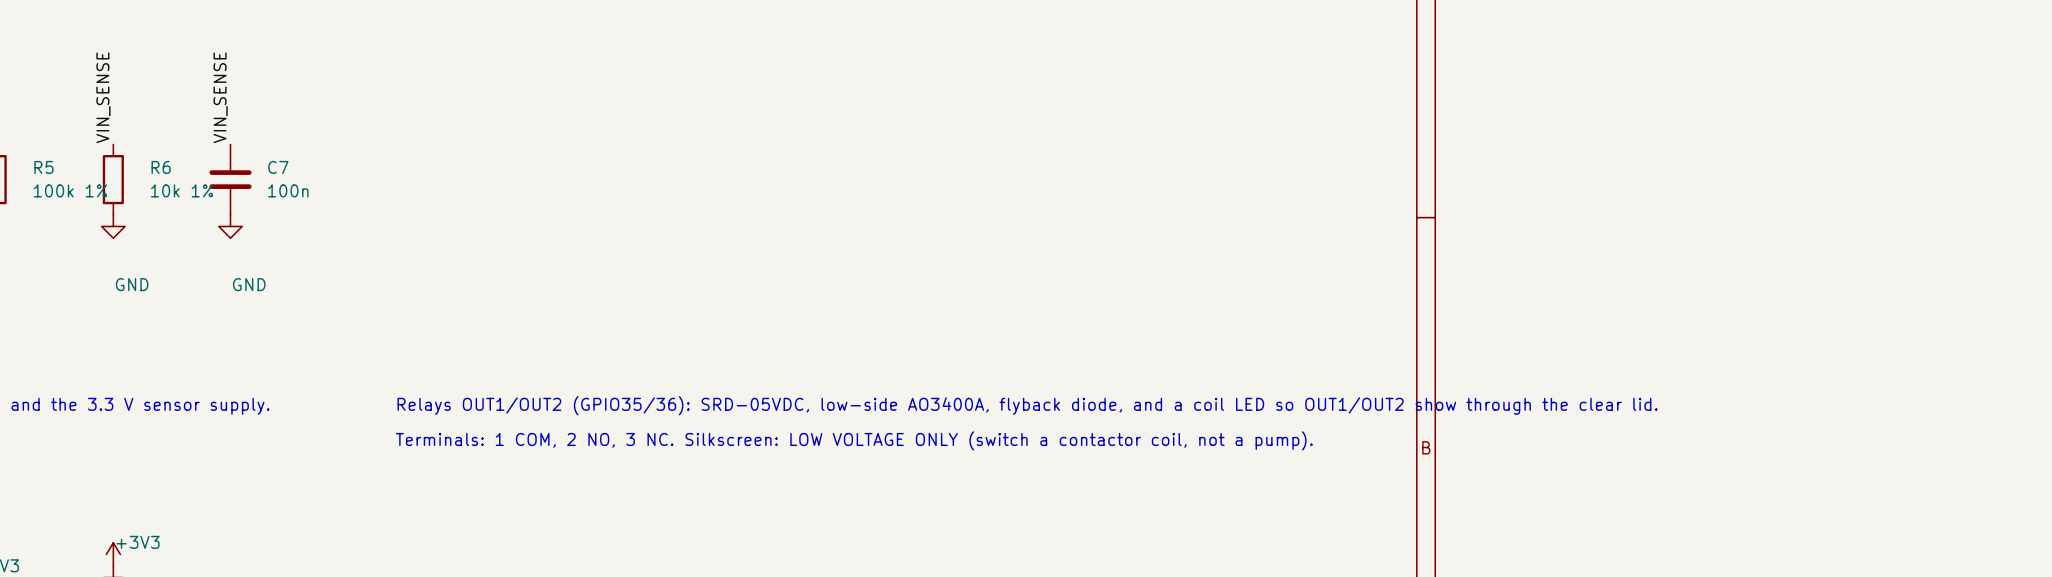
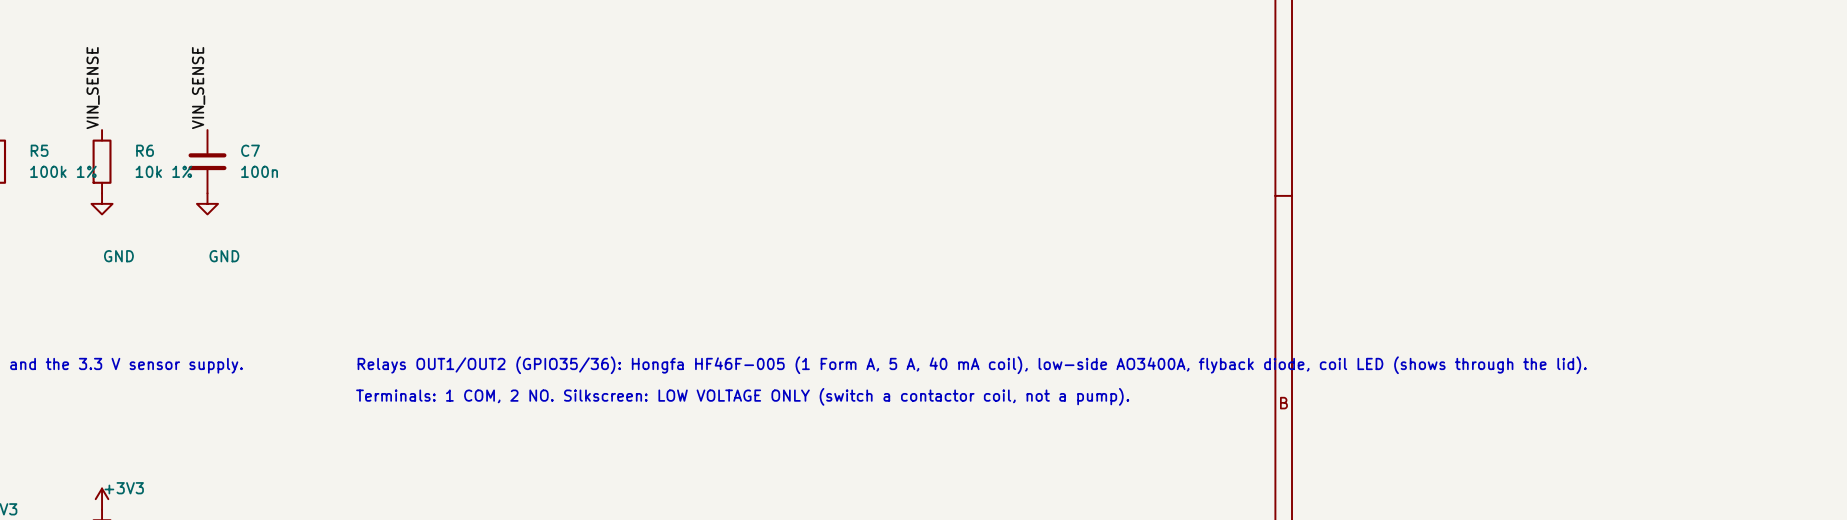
text: Relays OUT1/OUT2 (GPIO35/36): SRD-05VDC, low-side AO3400A, flyback diode, and a coil LED so OUT1/OUT2 show through the clear lid. (1027, 405) -> Relays OUT1/OUT2 (GPIO35/36): Hongfa HF46F-005 (1 Form A, 5 A, 40 mA coil), low-side AO3400A, flyback diode, coil LED (shows through the lid). (972, 365)
text: Terminals: 1 COM, 2 NO, 3 NC. Silkscreen: LOW VOLTAGE ONLY (switch a contactor coil, not a pump). (854, 440) -> Terminals: 1 COM, 2 NO. Silkscreen: LOW VOLTAGE ONLY (switch a contactor coil, not a pump). (742, 396)

